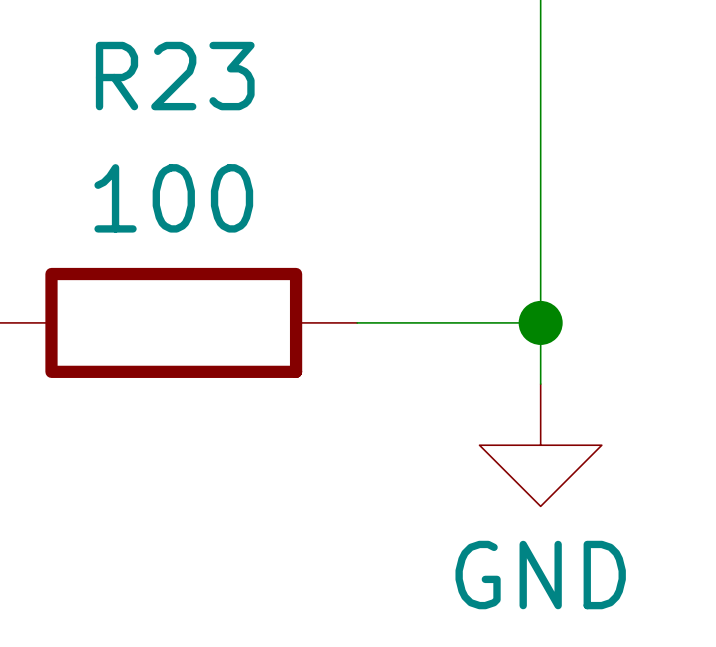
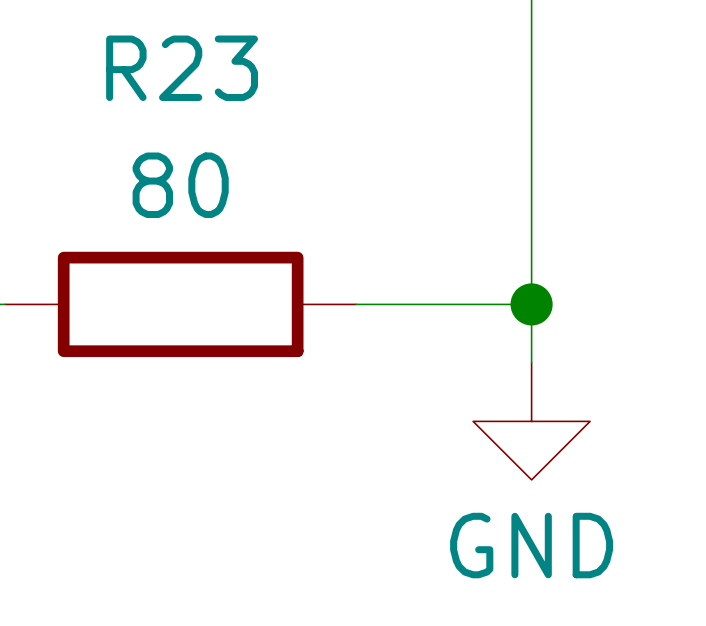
R23 value: 100 (173, 198) -> 80 (180, 185)

